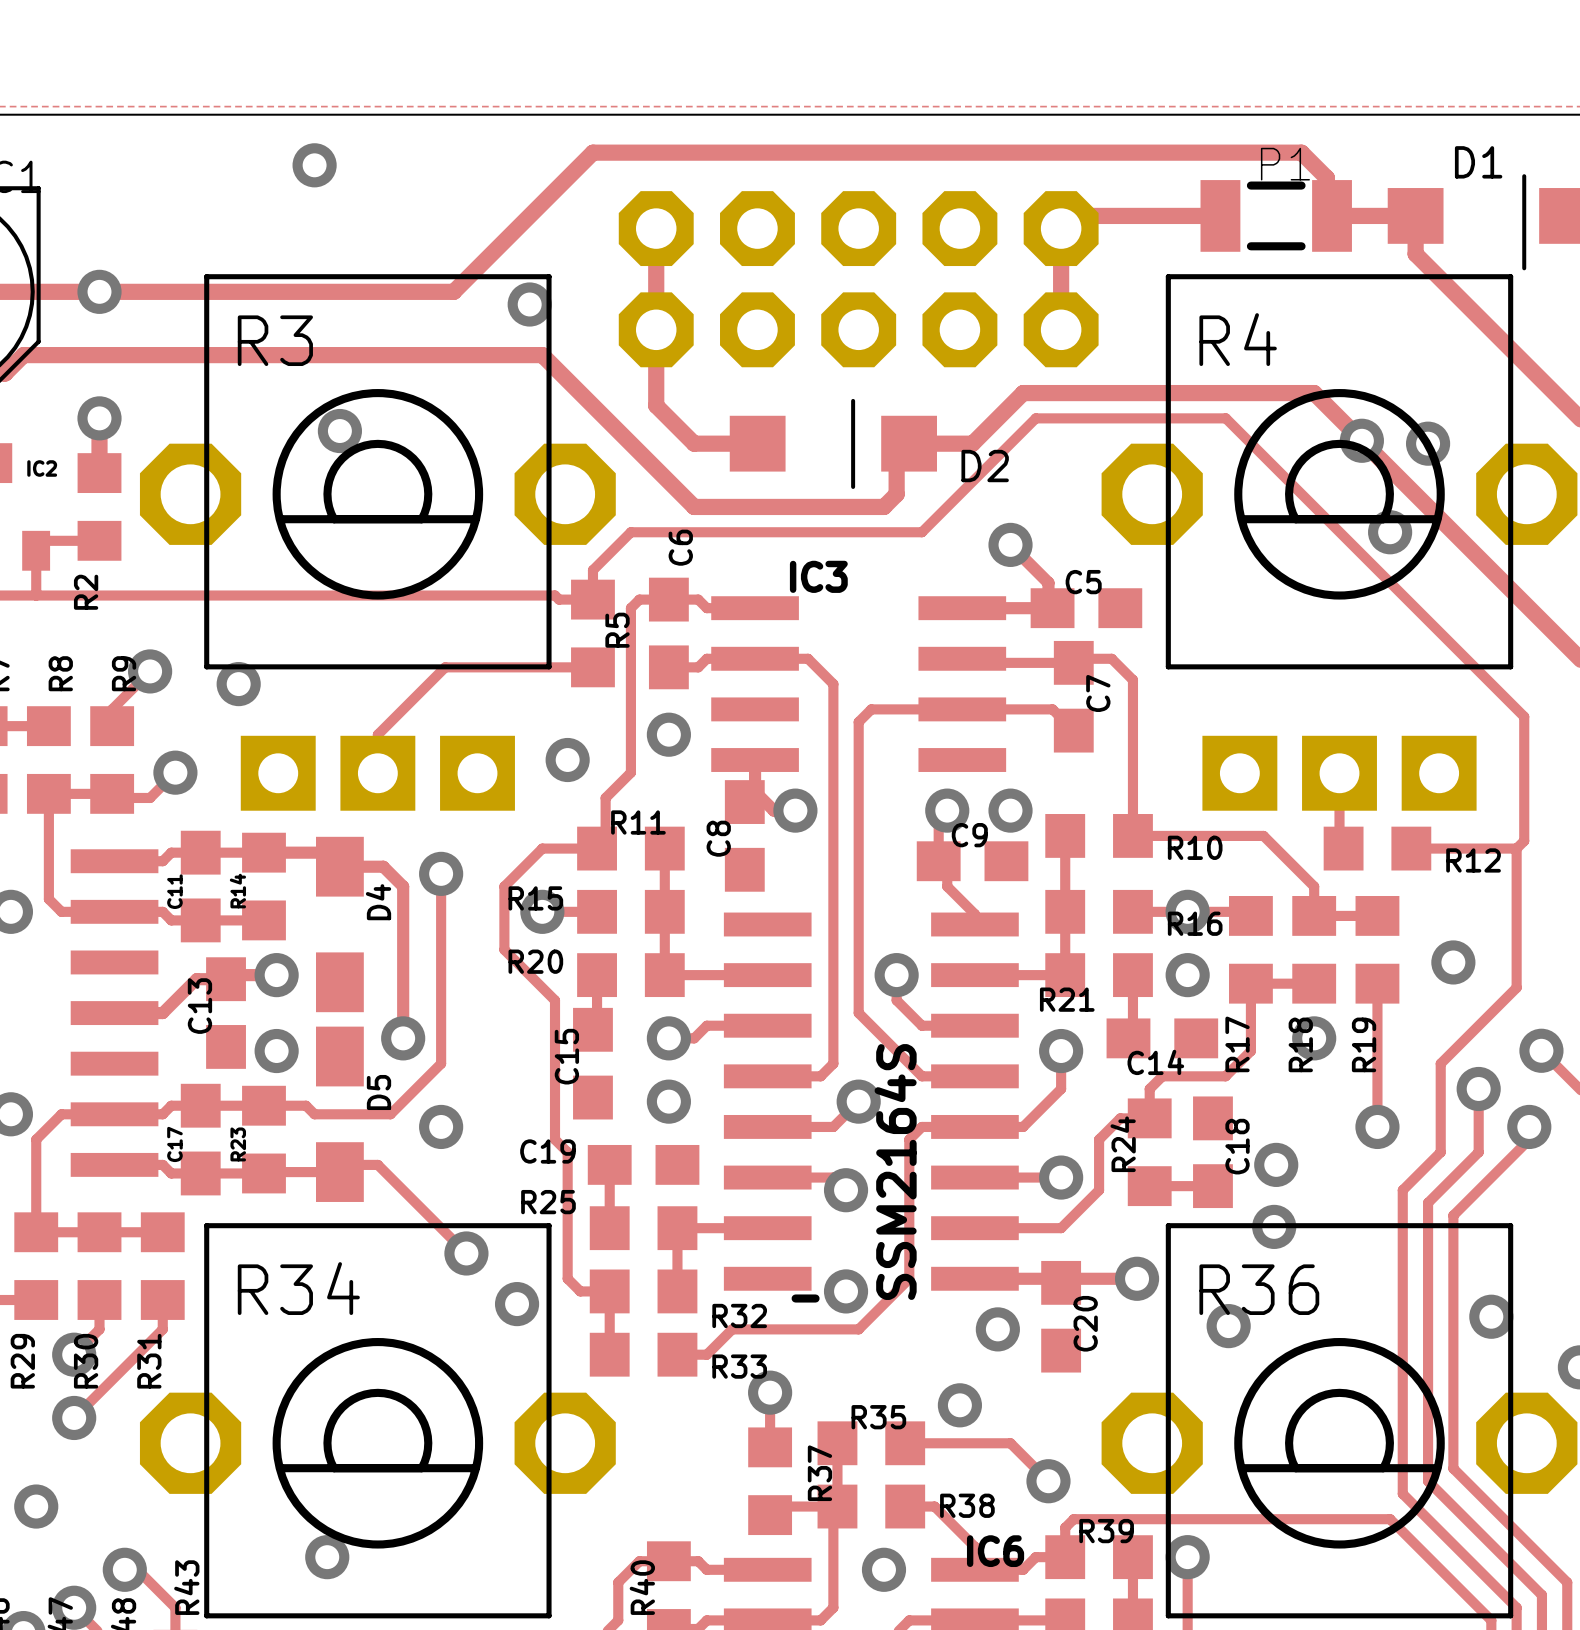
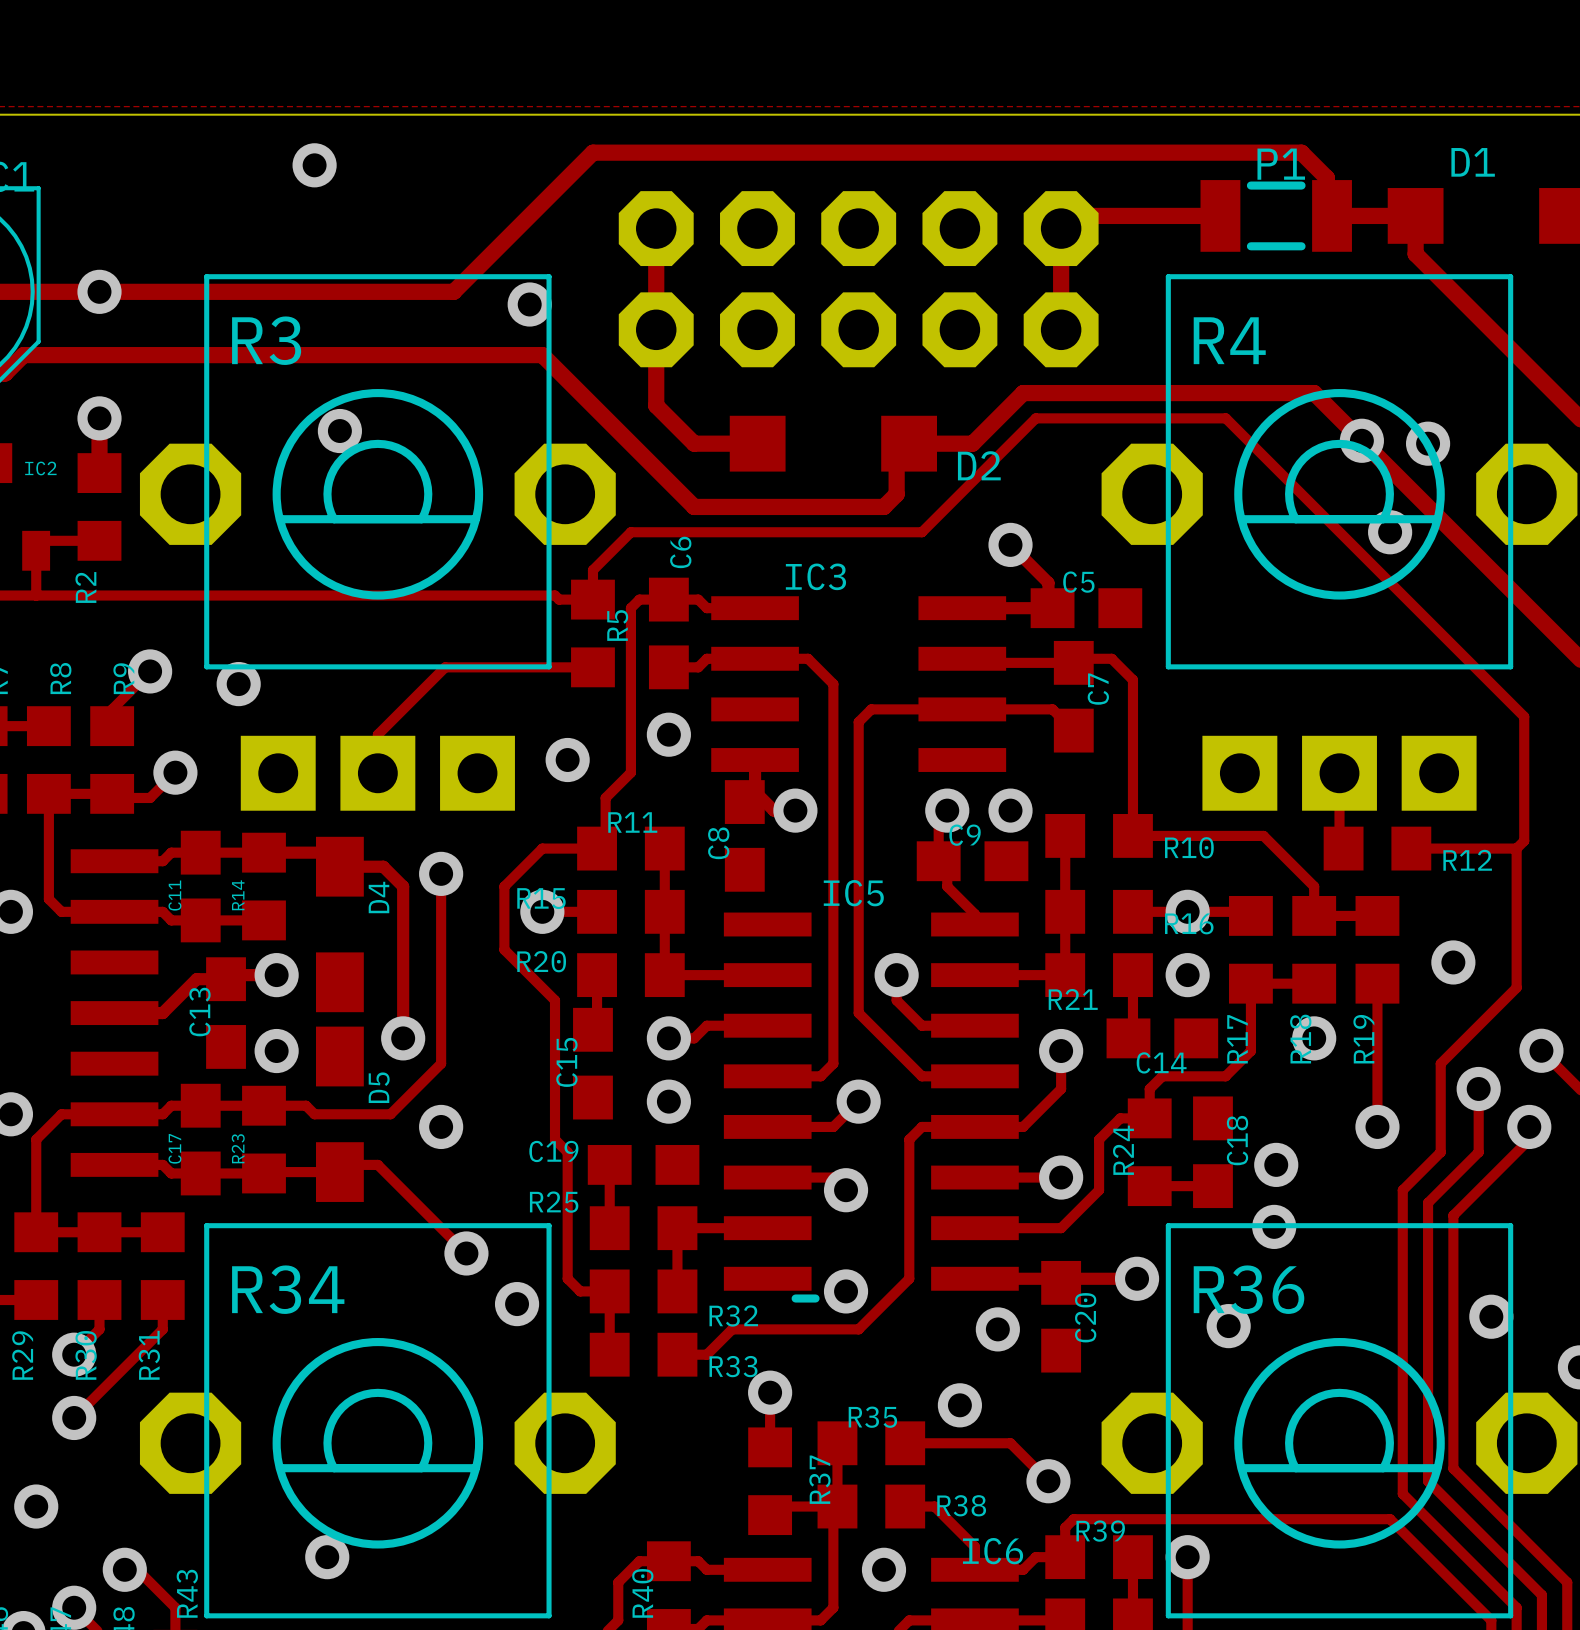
line: (1524, 176) (1524, 268) -> none
line: (853, 400) (853, 486) -> none
IC5 name: none -> IC5 (853, 893)
IC5 value: SSM2164S (895, 1172) -> none

